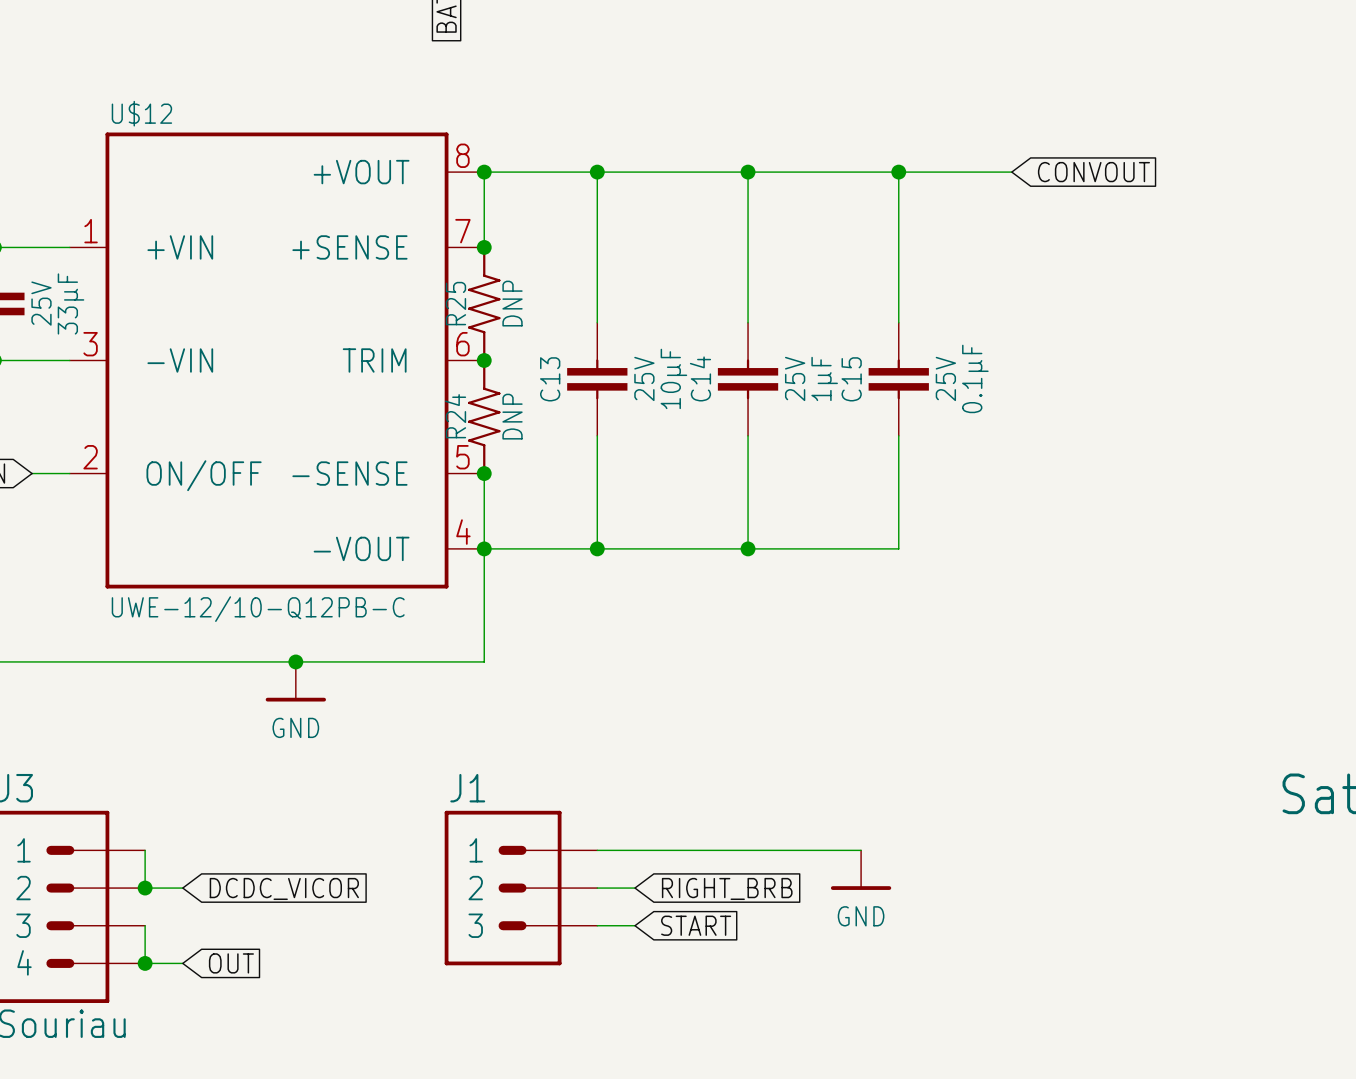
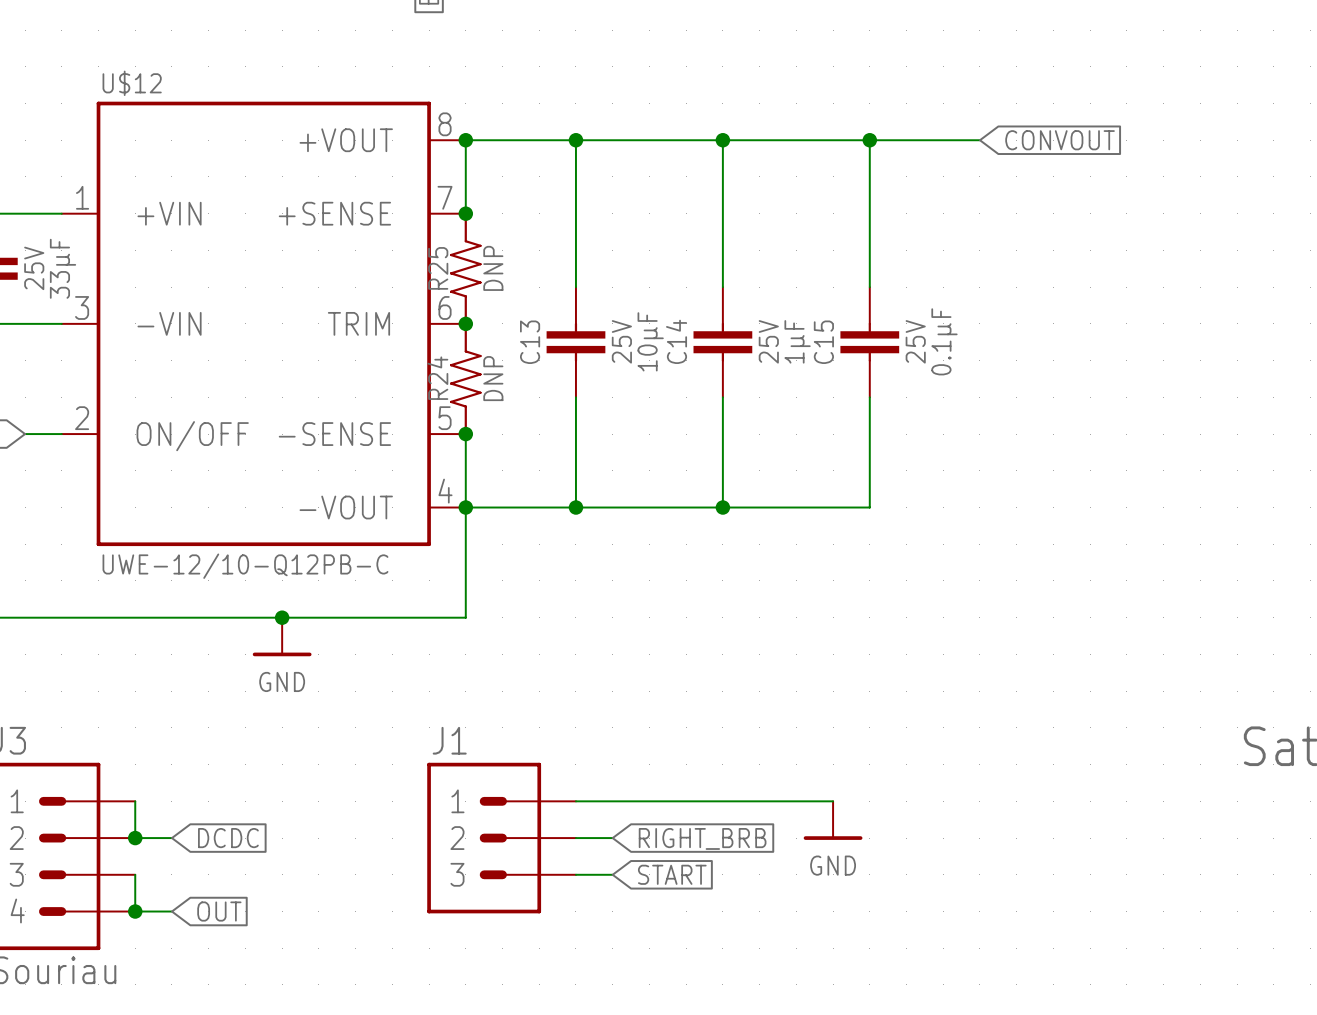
global label: DCDC_VICOR (284, 888) -> DCDC (228, 838)

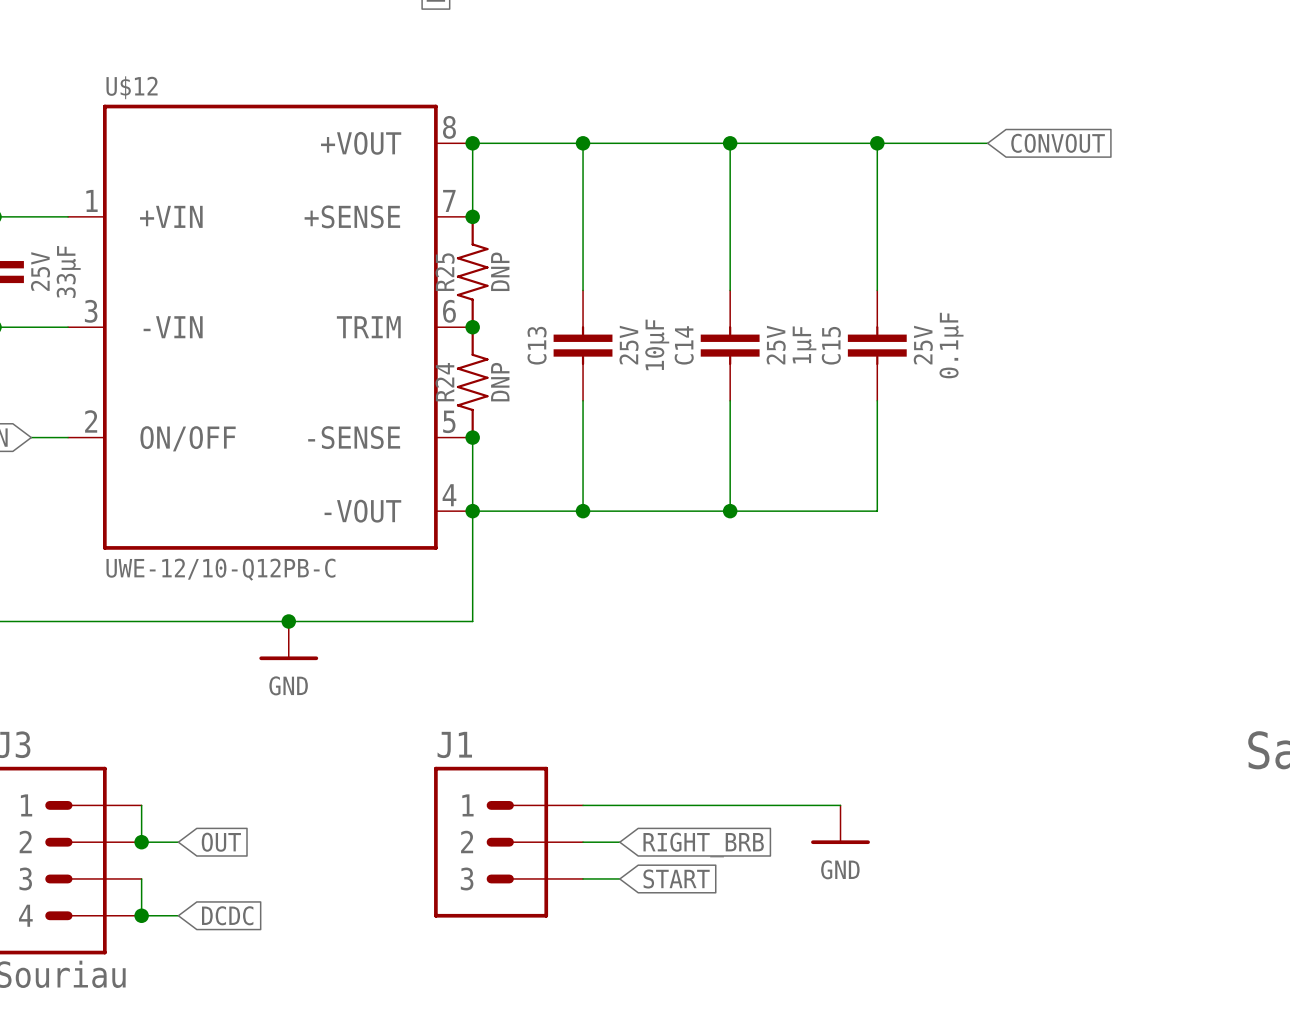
global label: DCDC (228, 838) -> OUT (221, 842)
global label: OUT (219, 911) -> DCDC (227, 915)

